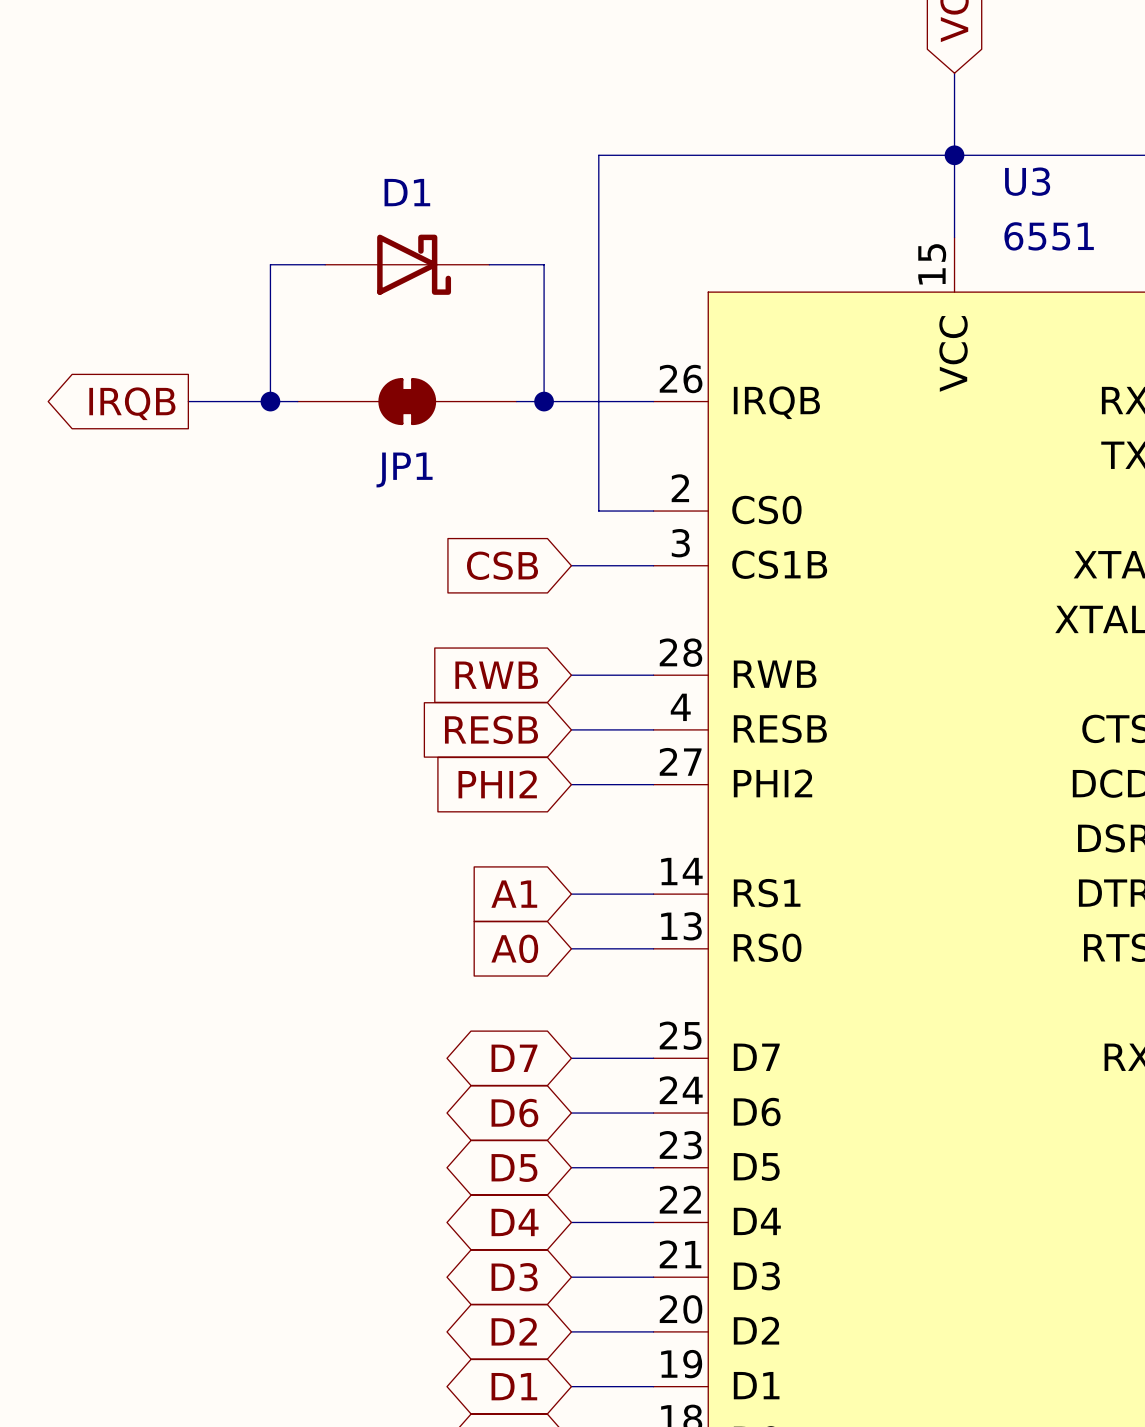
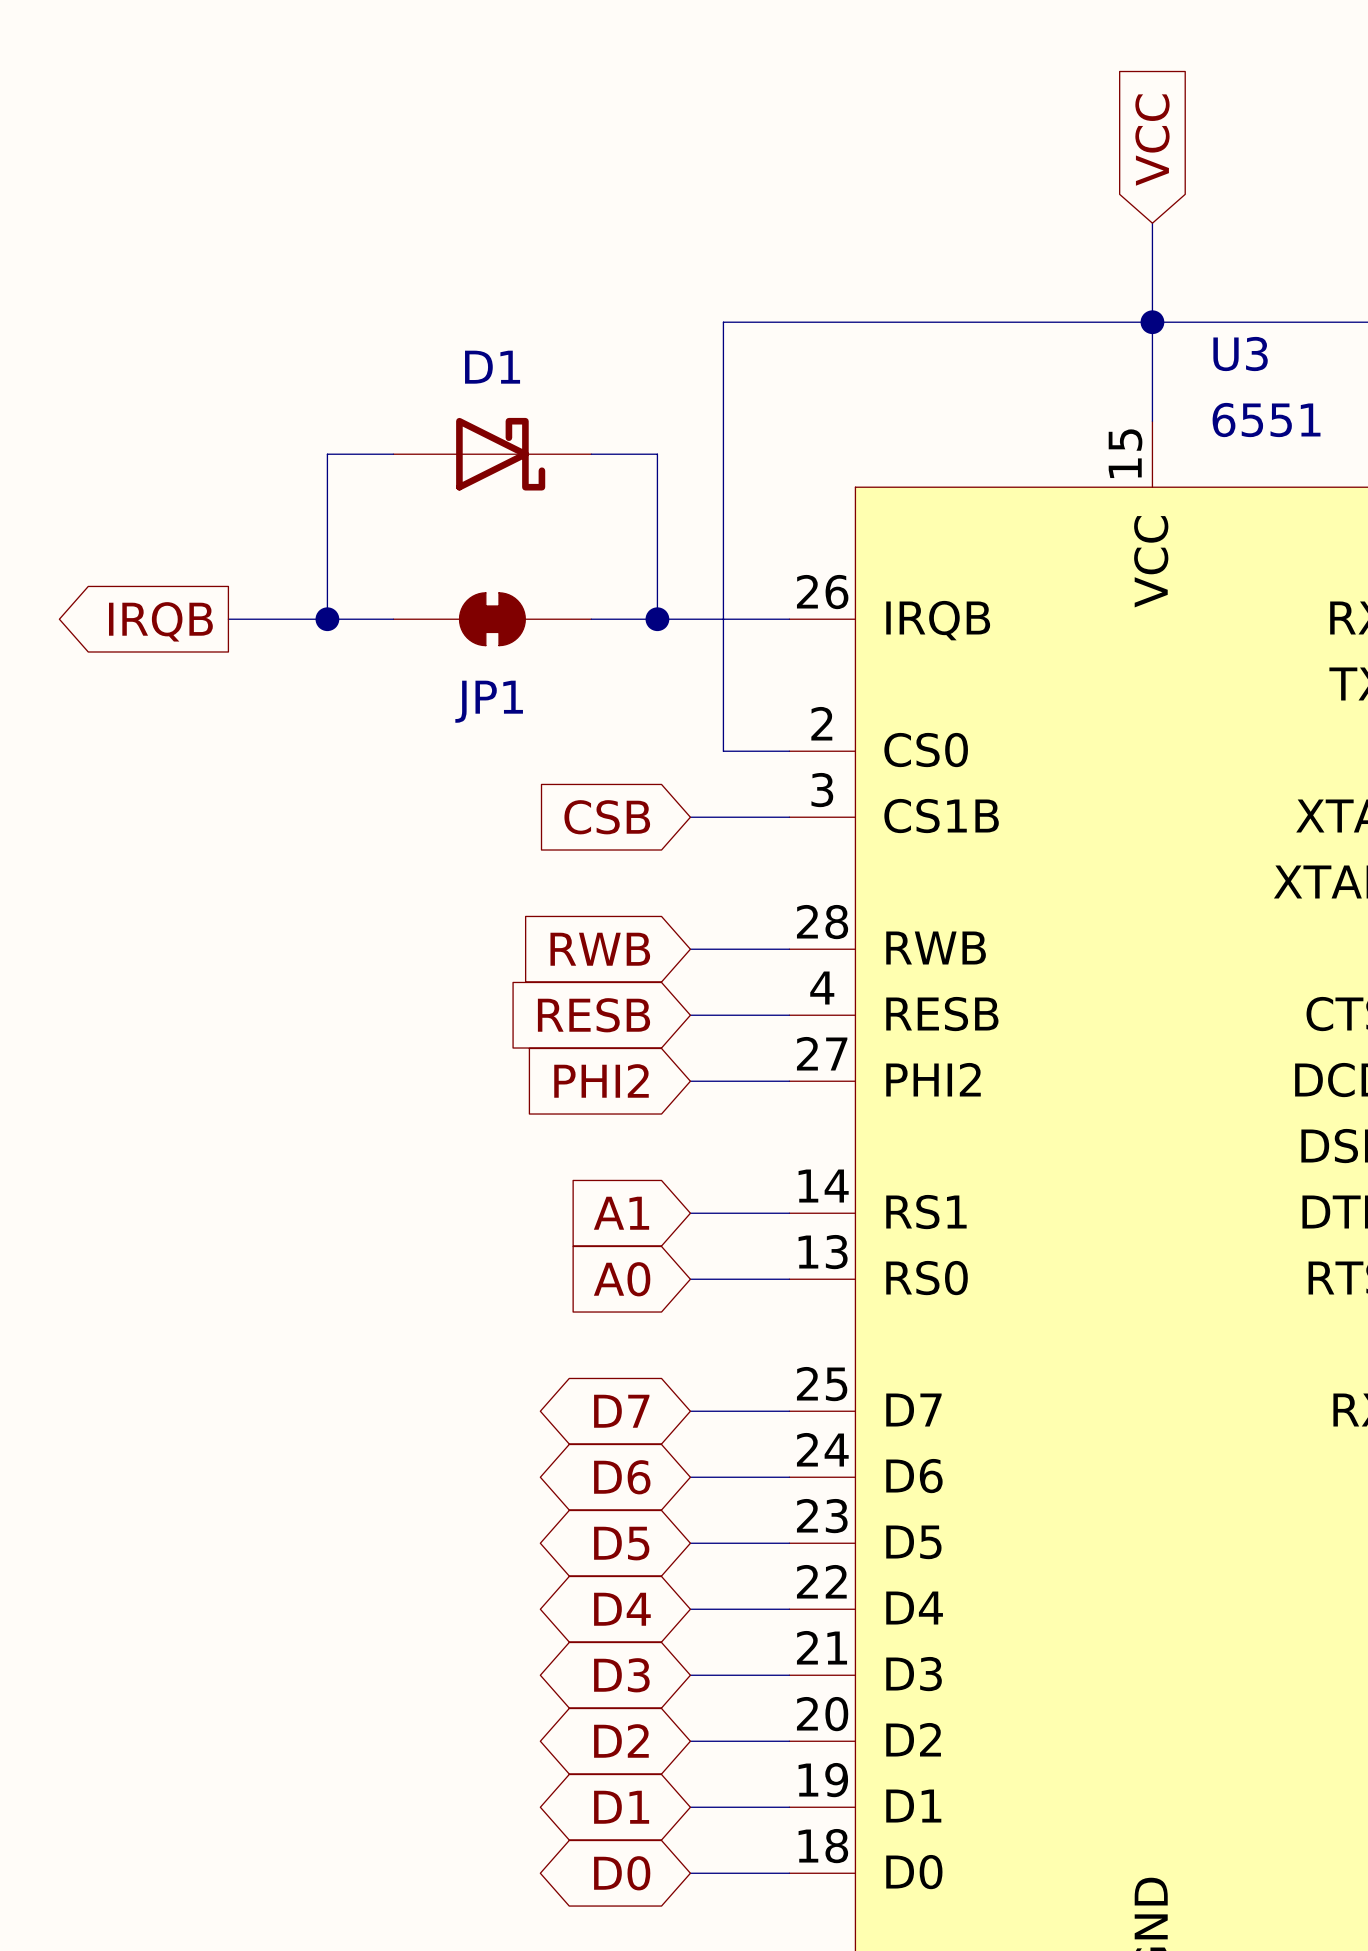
JP1 symbol: [297, 378, 517, 426] -> [393, 592, 592, 646]

